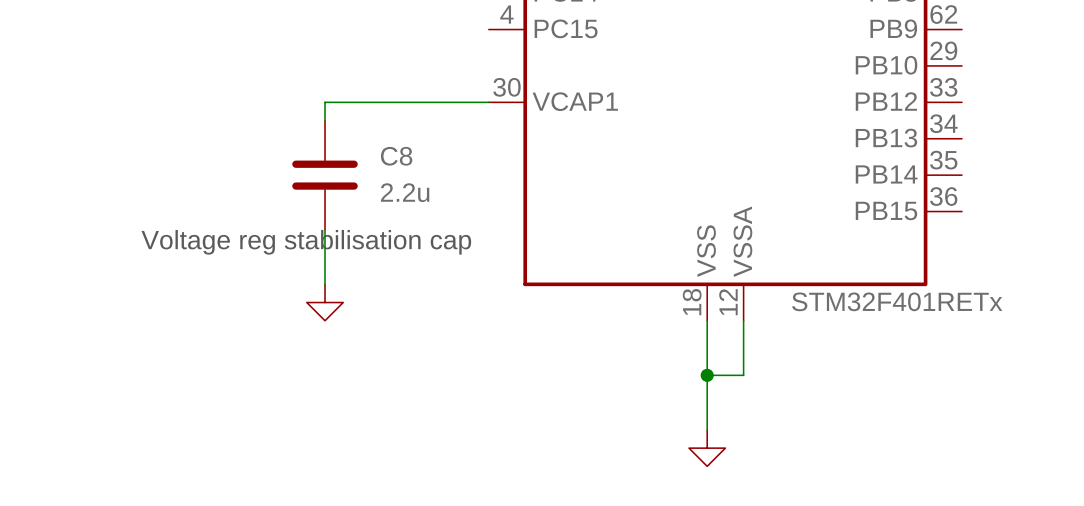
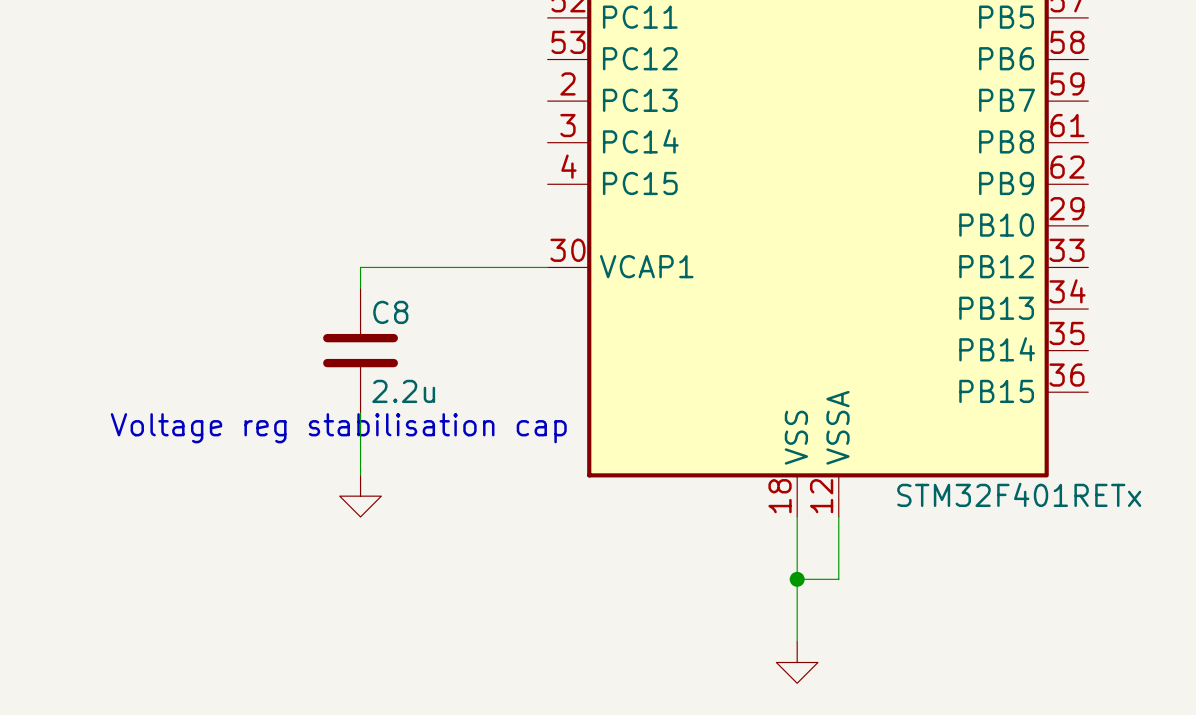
C8 name position: C8 (396, 156) -> C8 (390, 312)
C8 value position: 2.2u (405, 192) -> 2.2u (403, 391)

